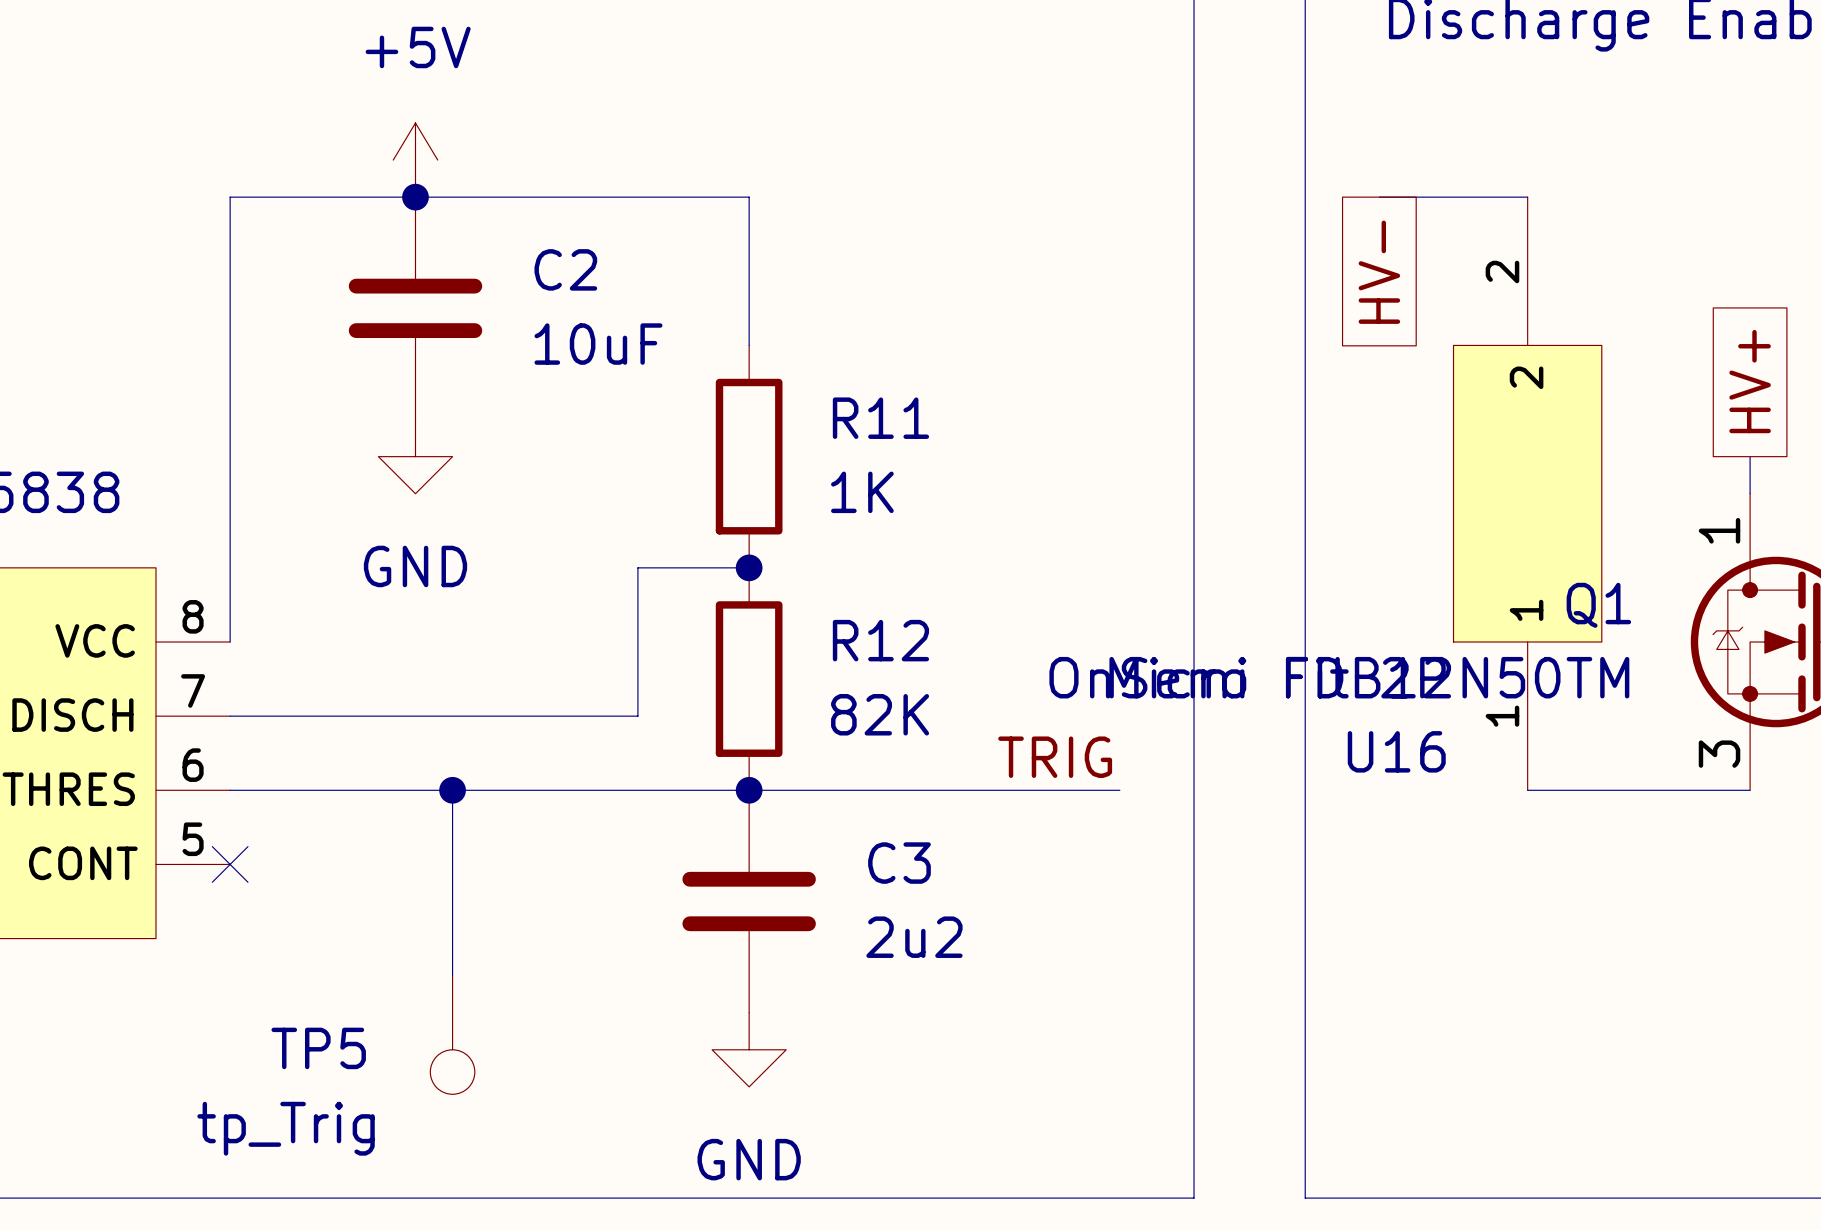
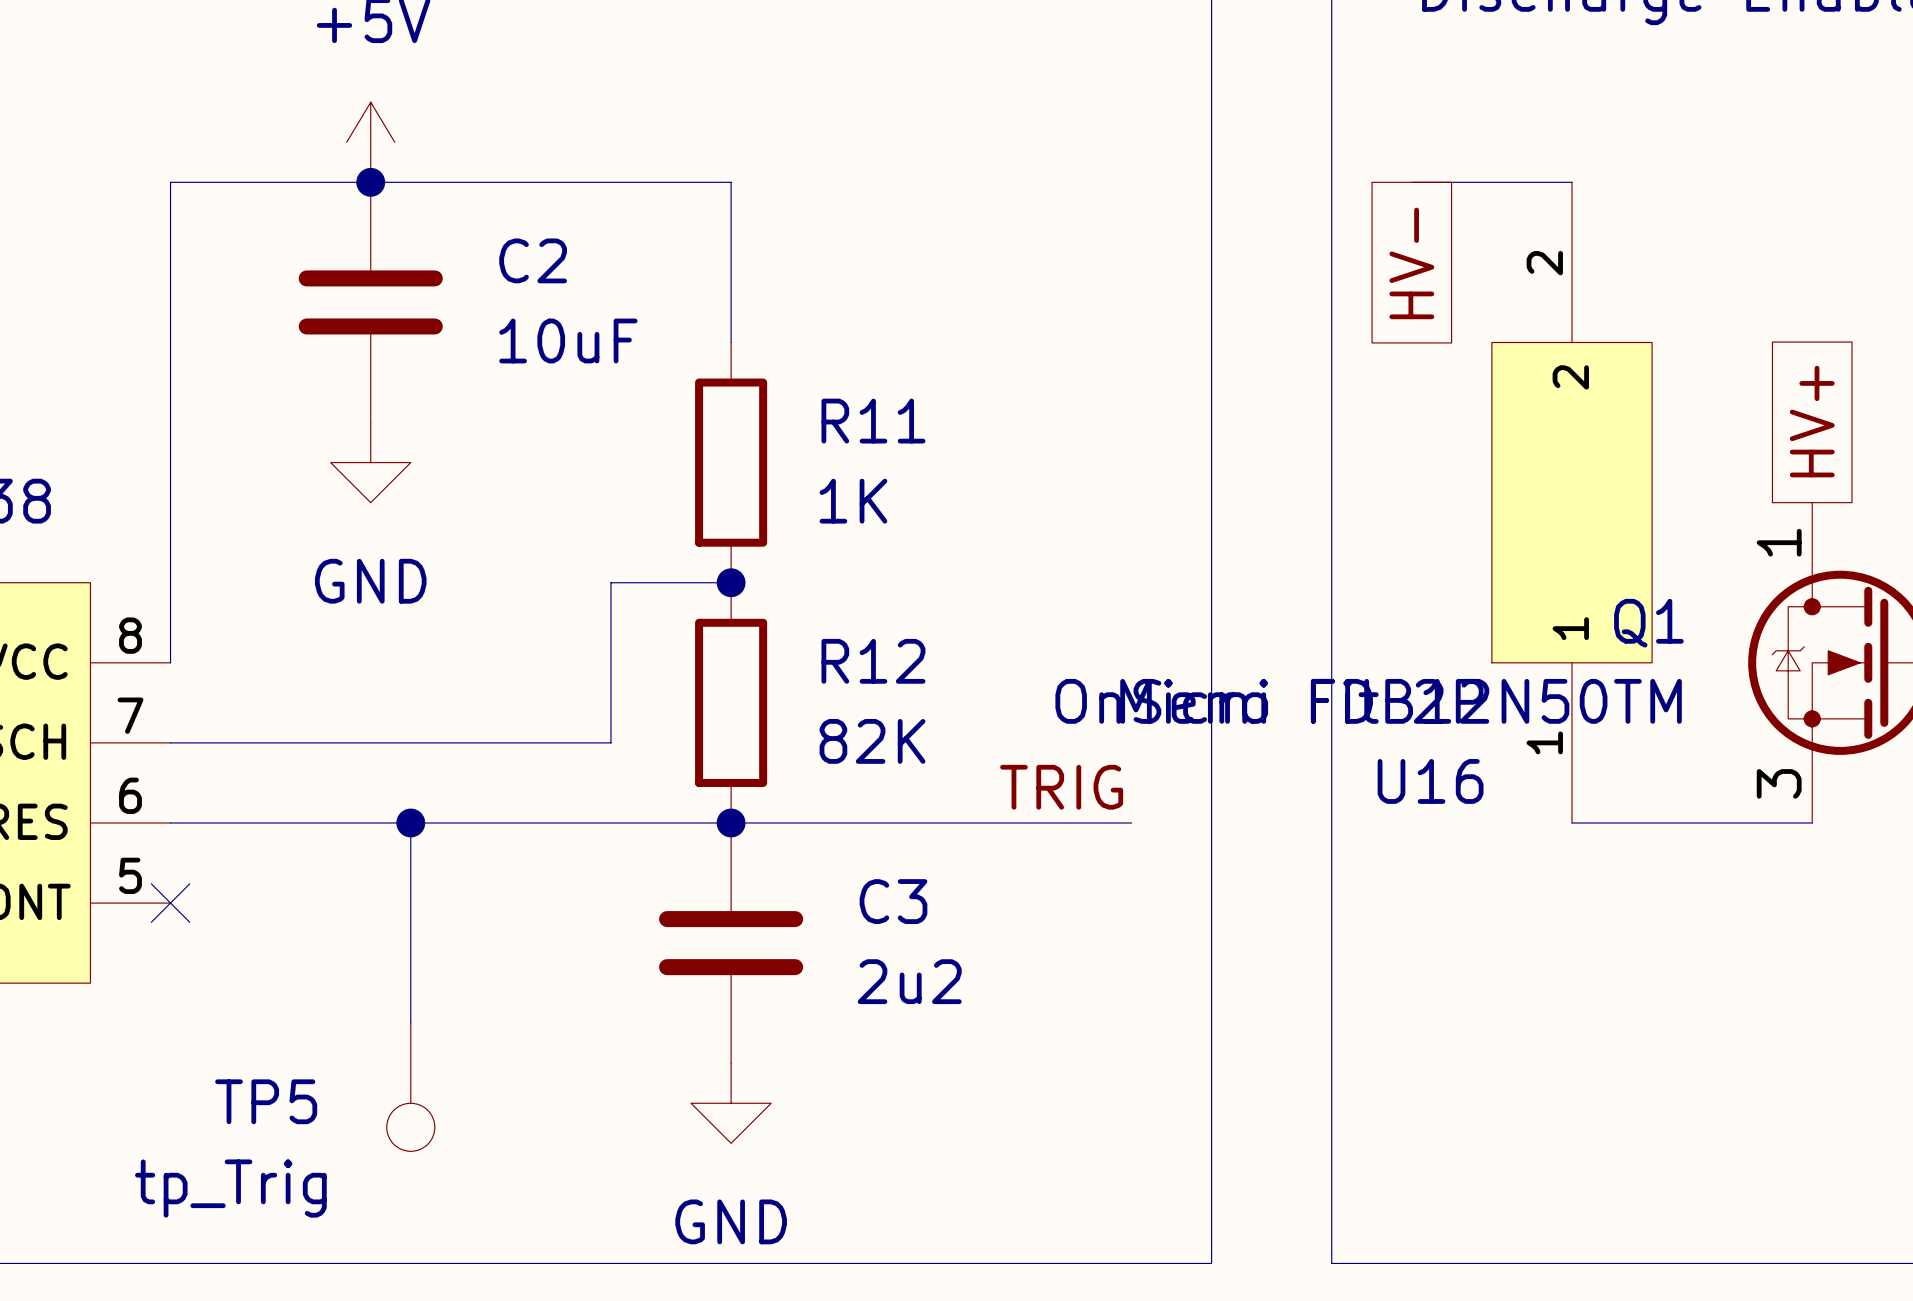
global label position: HV+ (1750, 381) -> HV+ (1812, 421)
wire: (1750, 456) (1750, 493) -> none

